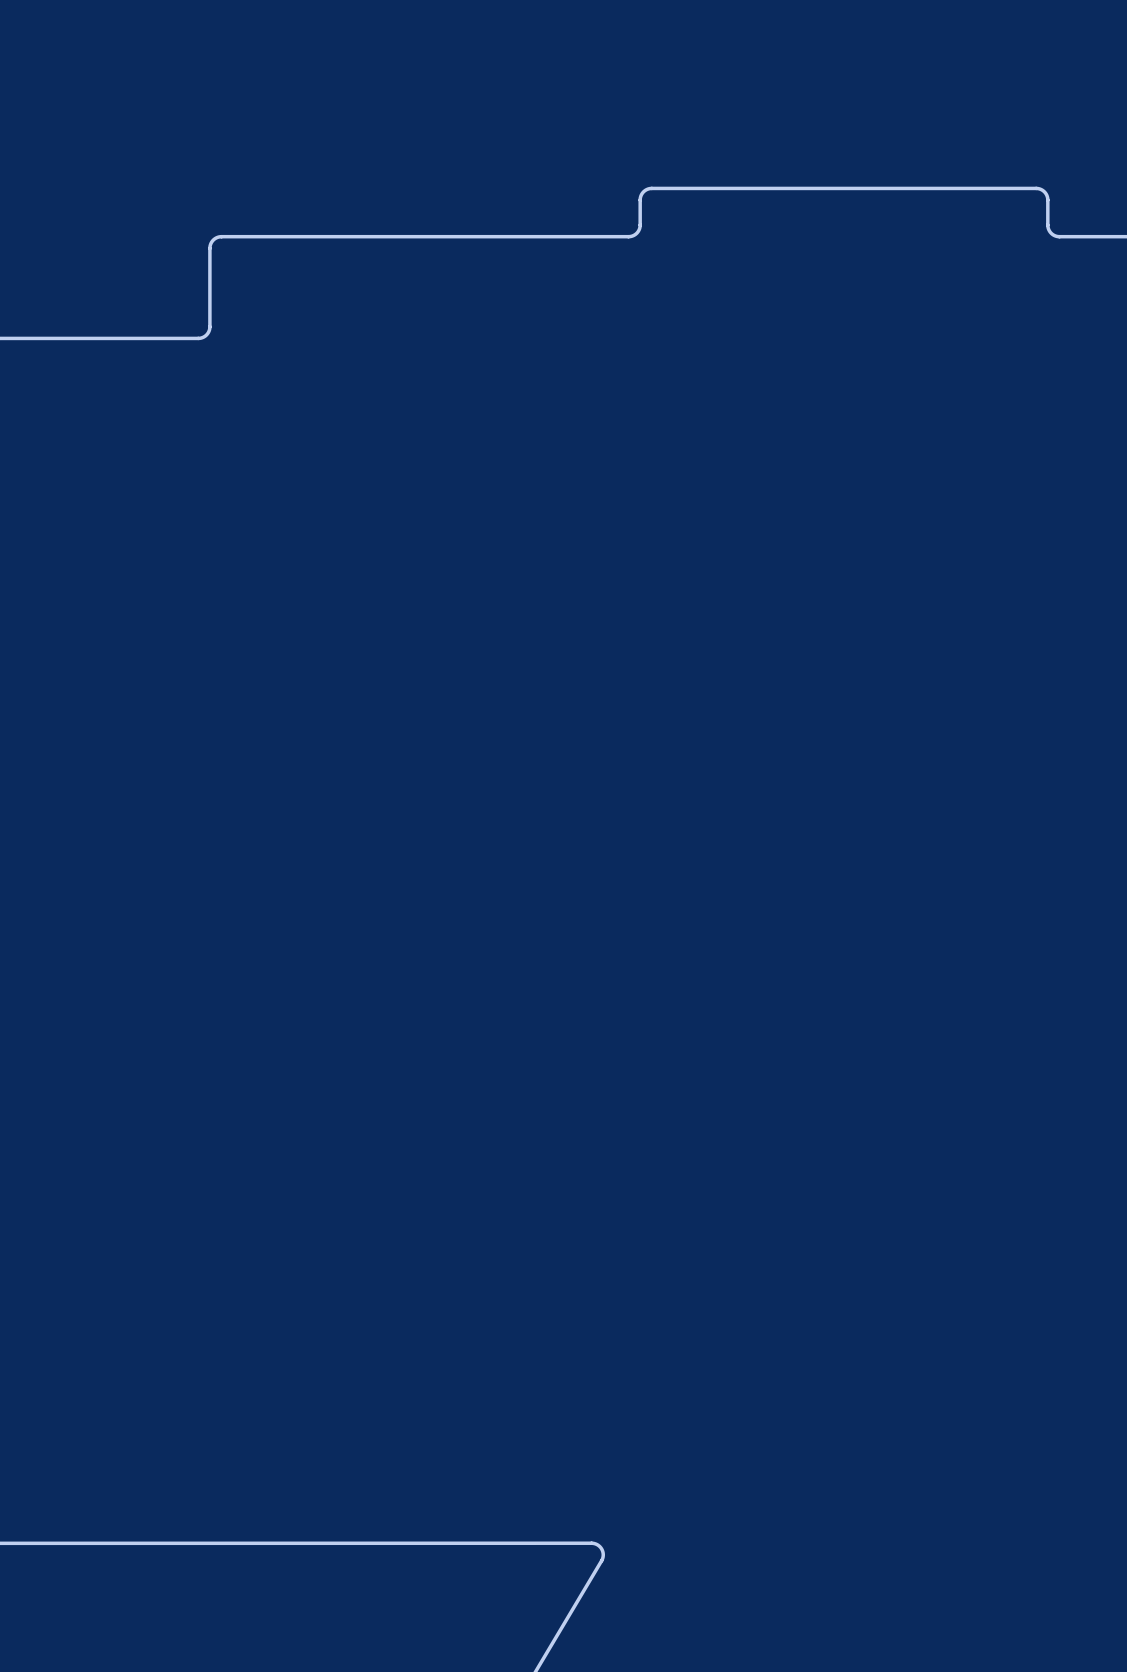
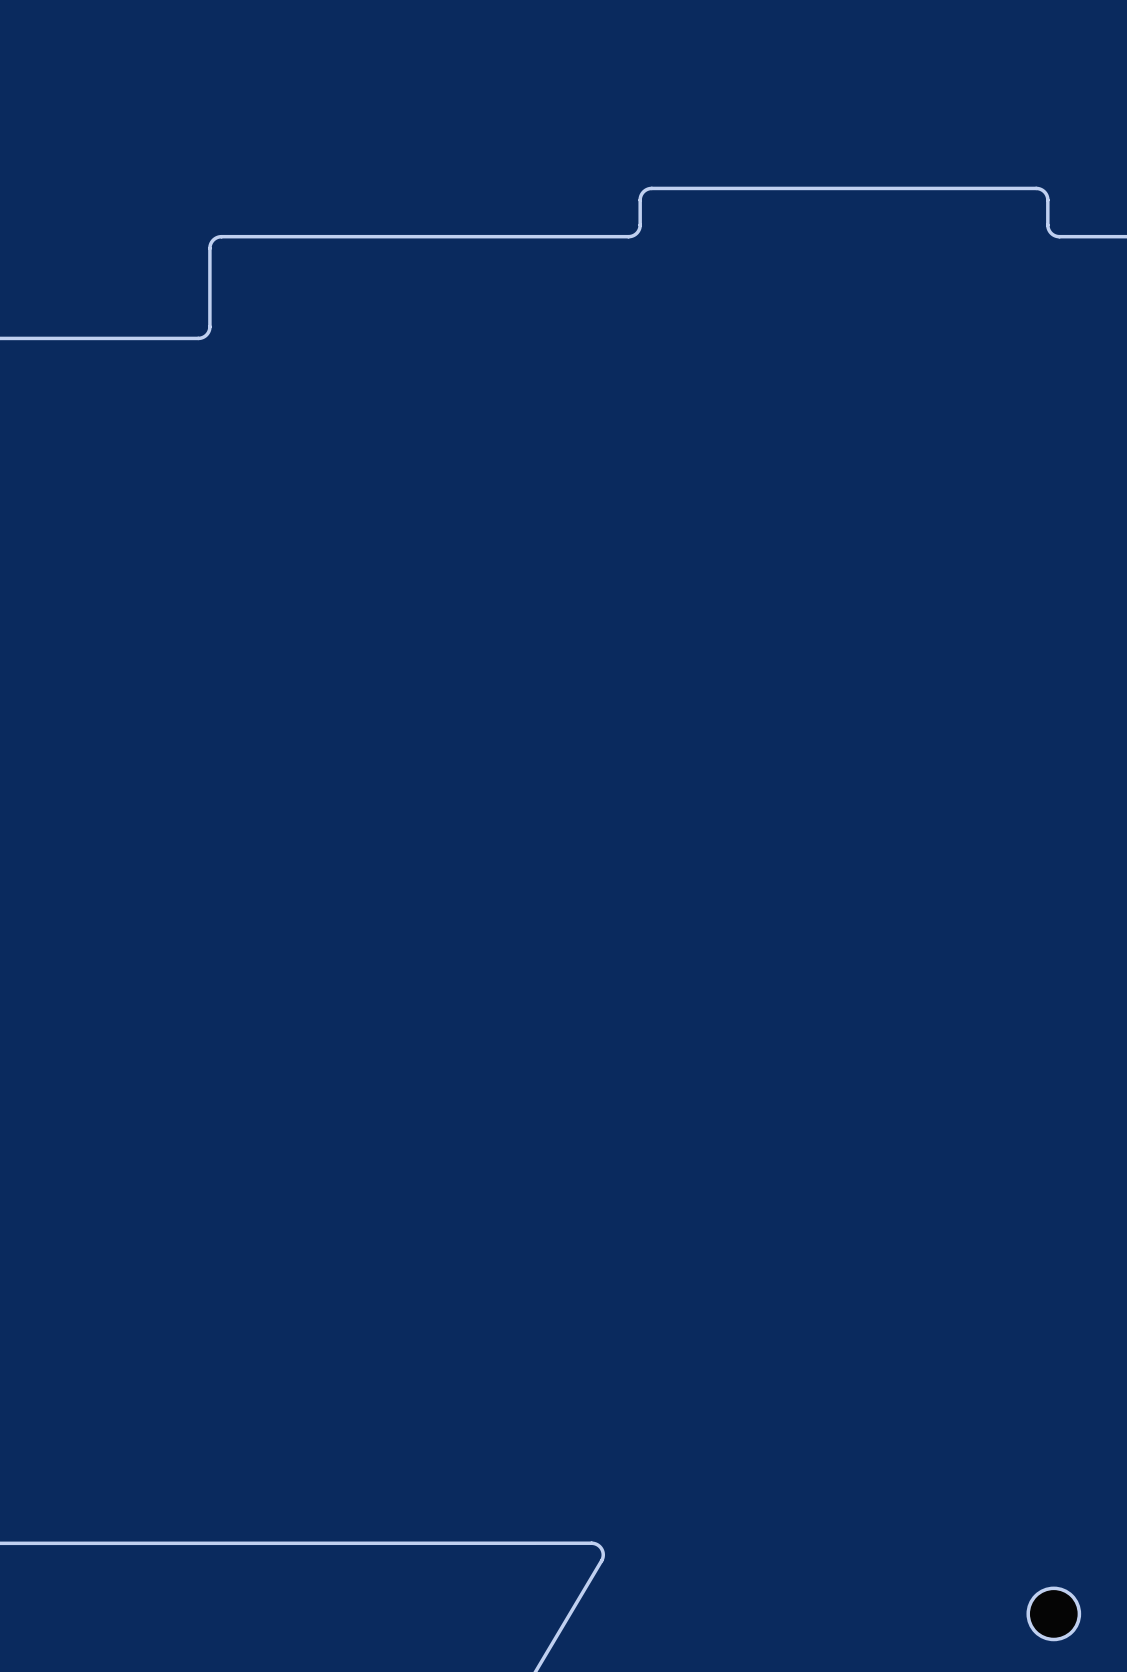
round board edge: none -> [1026, 1586, 1082, 1642]
part: none -> (1053, 1613)

